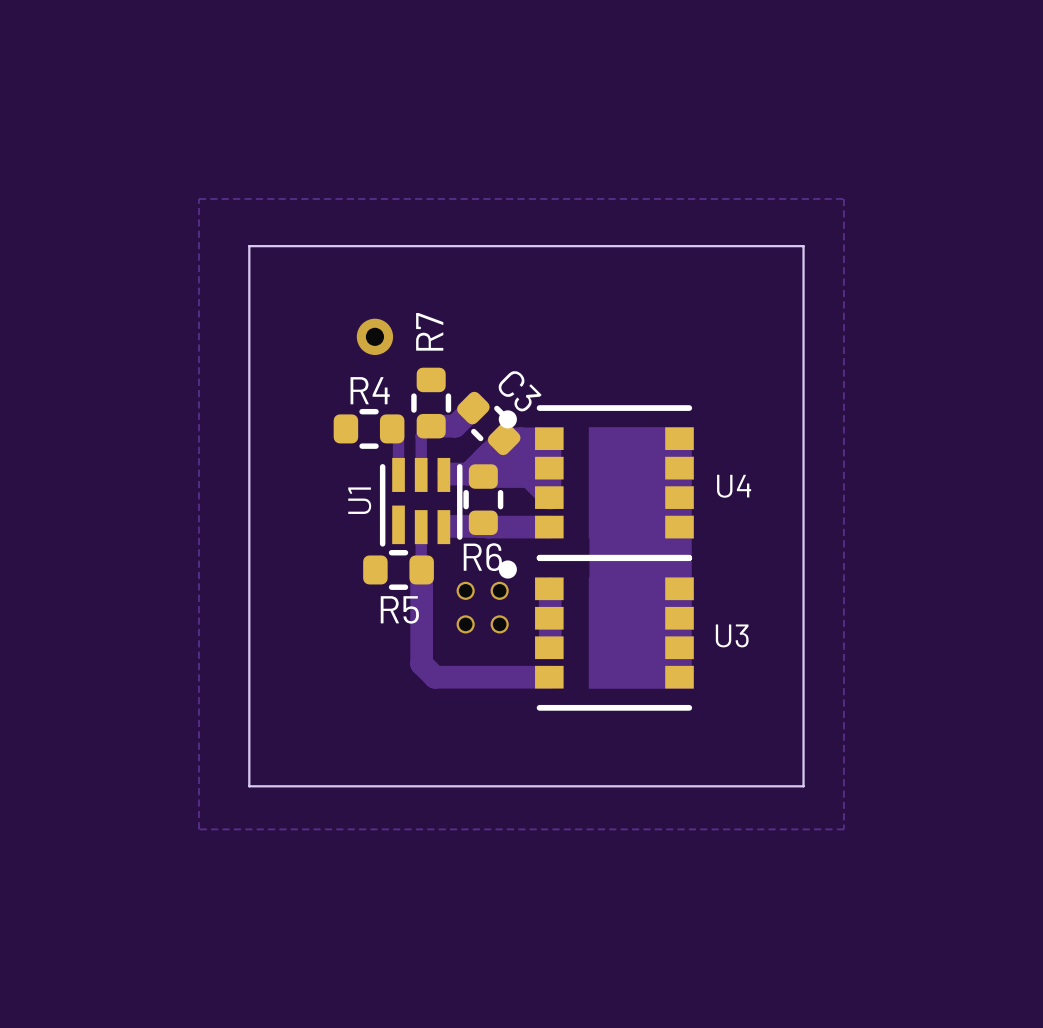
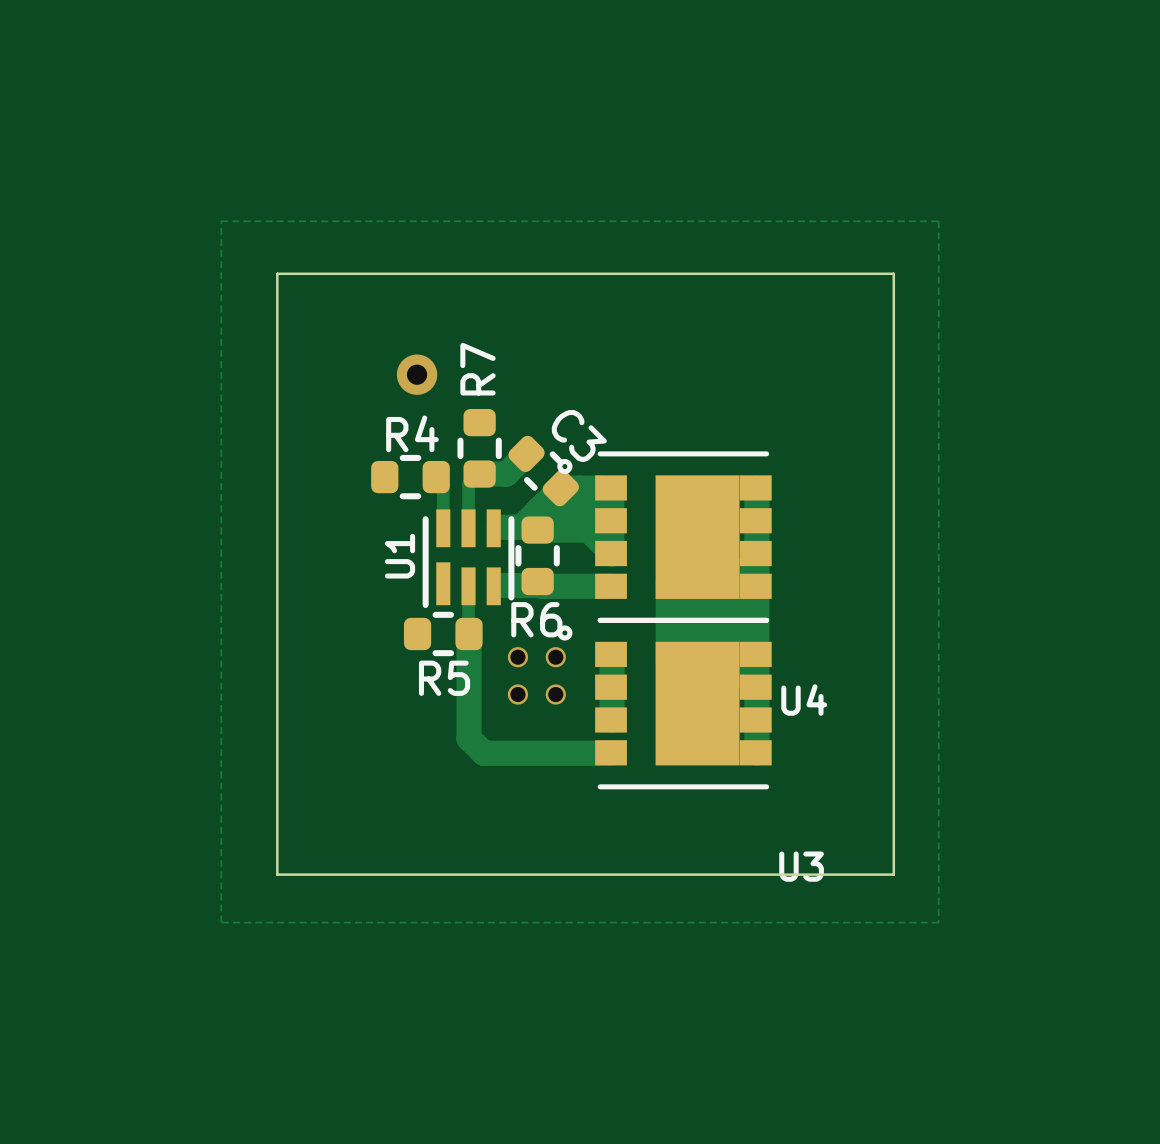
U4 footprint: [498, 405, 695, 561] -> [557, 451, 772, 623]
U4 name position: U4 (734, 486) -> U4 (804, 700)
U3 footprint: [498, 555, 695, 711] -> [557, 617, 772, 790]
U3 name position: U3 (732, 635) -> U3 (801, 866)

